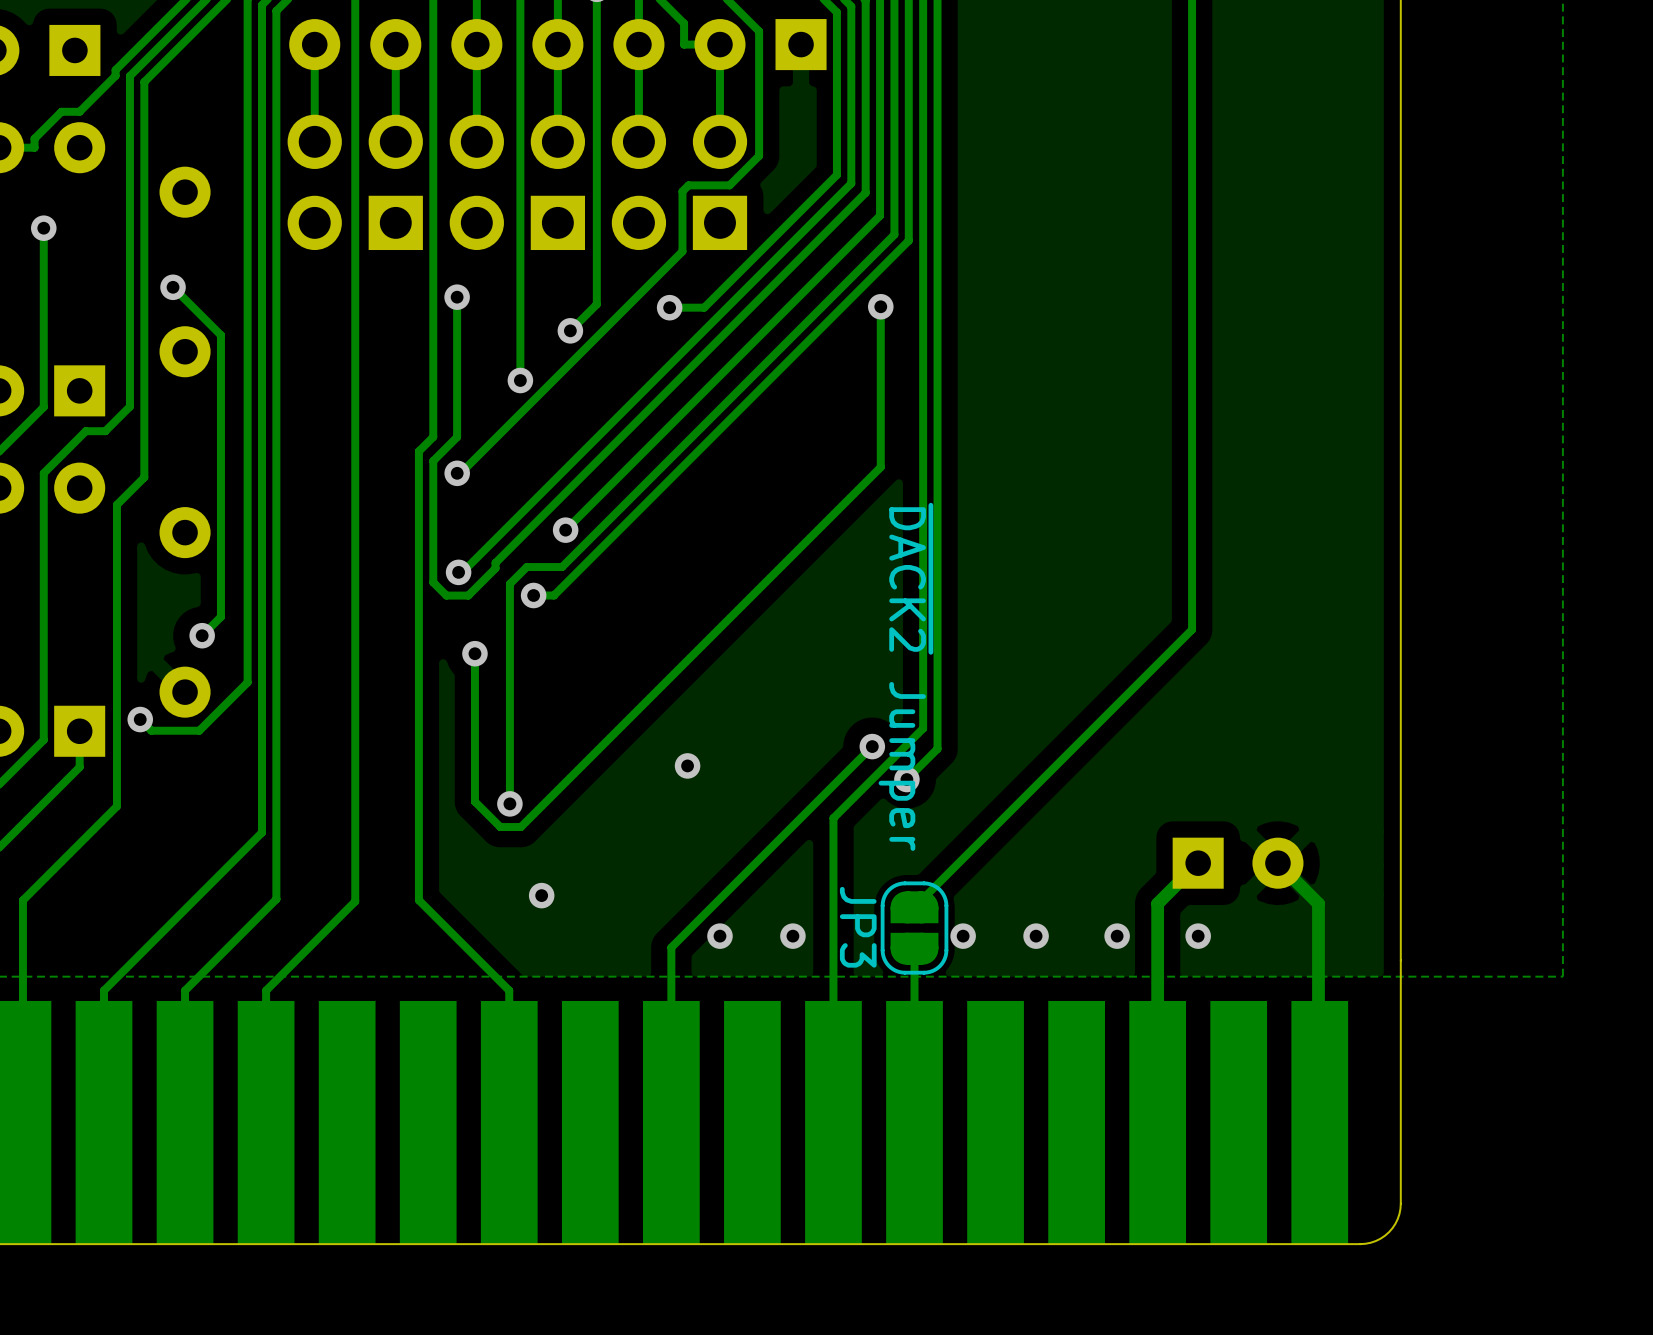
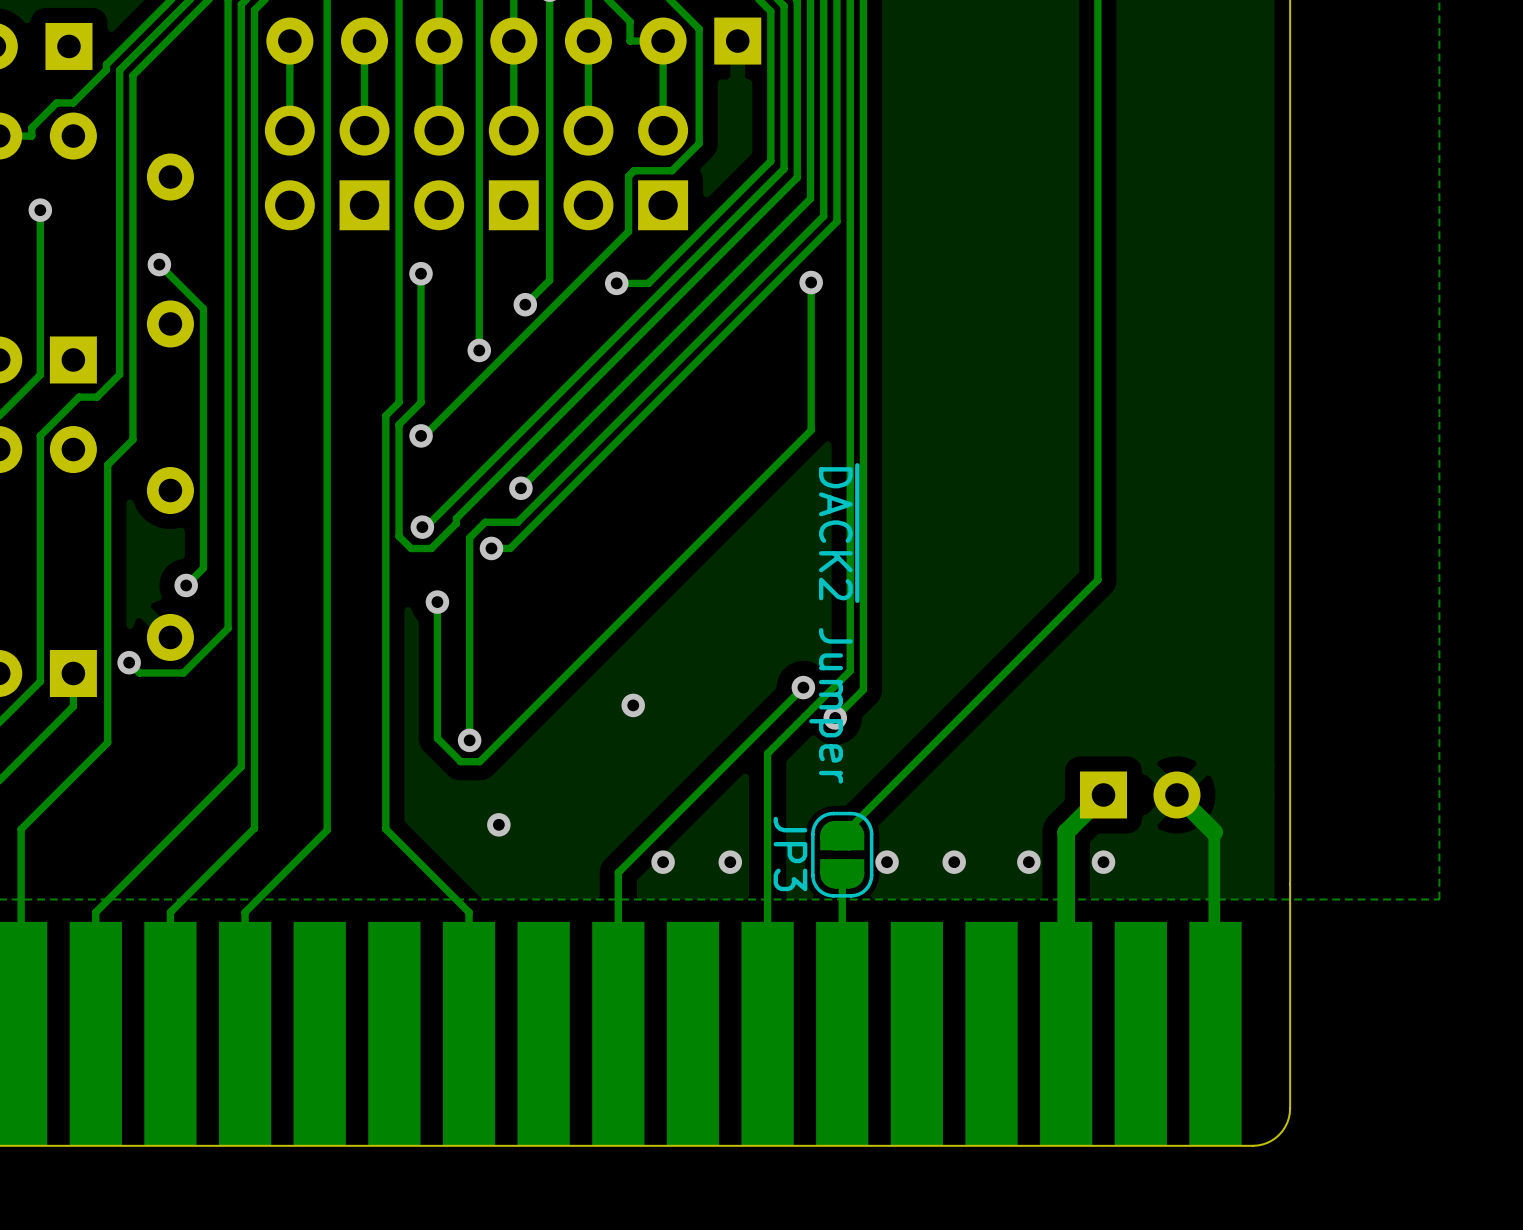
track width: thin (1198, 863) (1157, 903) (1157, 1122) -> thick (1103, 794) (1066, 832) (1066, 1033)
track width: thin (1277, 863) (1318, 903) -> thick (1176, 794) (1214, 832)

